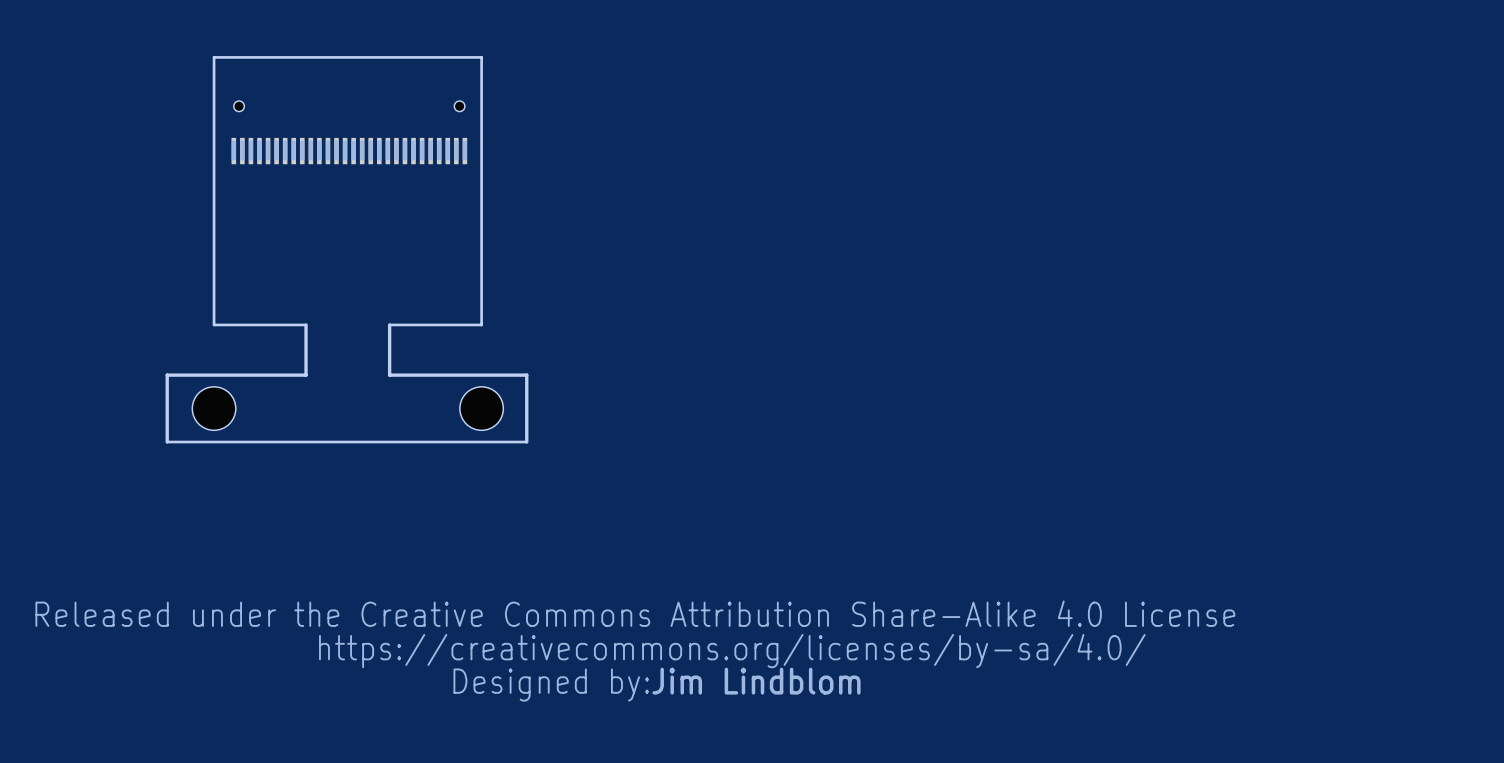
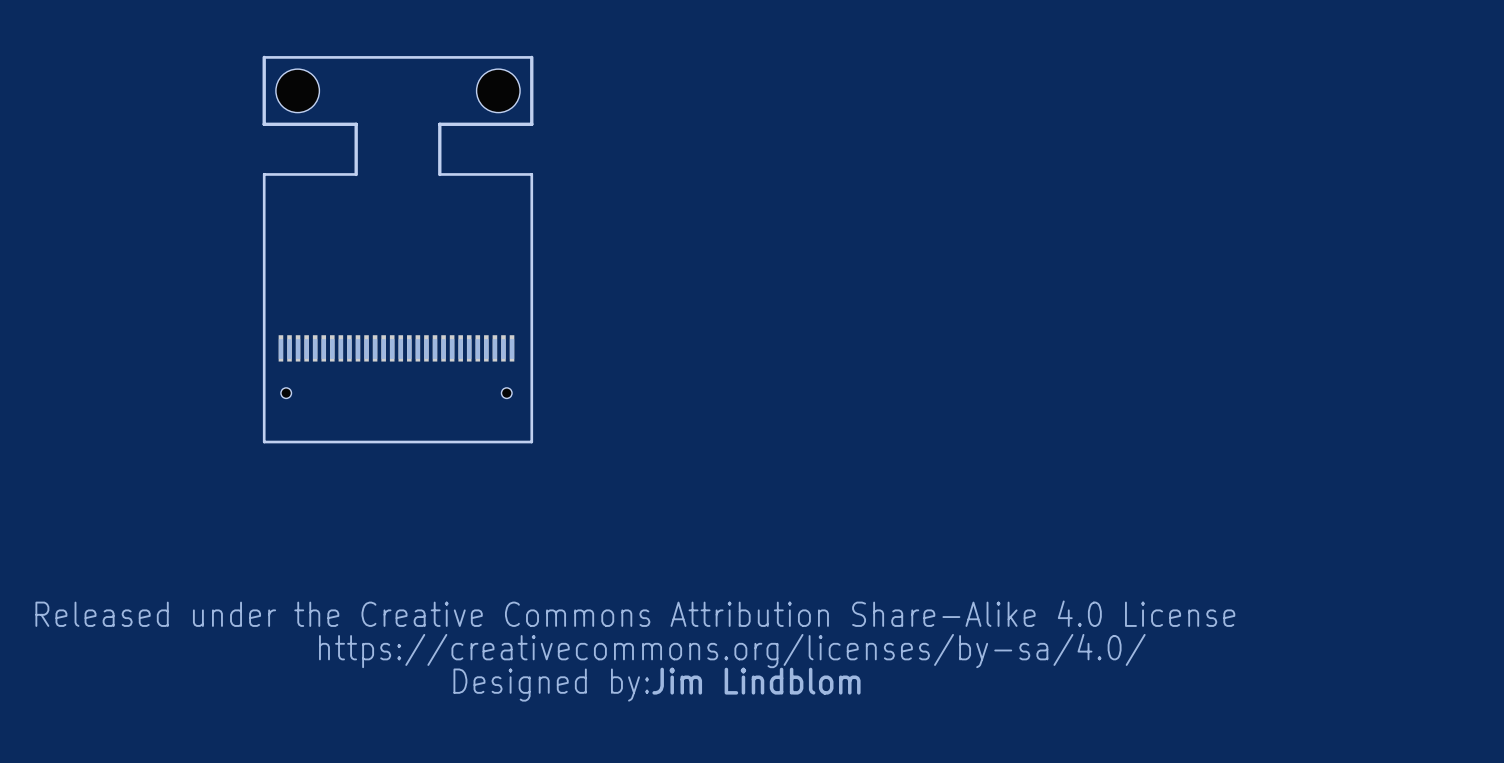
board edge: (264, 57) (214, 57) (214, 324) (306, 324) (306, 375) (167, 375) (167, 442) (264, 442) -> (264, 57) (264, 124) (356, 124) (356, 174) (264, 174) (264, 442)
board edge: (481, 57) (481, 324) (389, 324) (389, 375) (526, 375) (526, 442) -> (481, 57) (531, 57) (531, 124) (439, 124) (439, 174) (531, 174) (531, 442) (526, 442)
part: none -> (297, 90)
part: none -> (498, 90)
part rotation: 0° (349, 132) -> 180° (396, 366)
part position: (349, 132) -> (396, 366)
part: (214, 408) -> none
part: (481, 408) -> none

